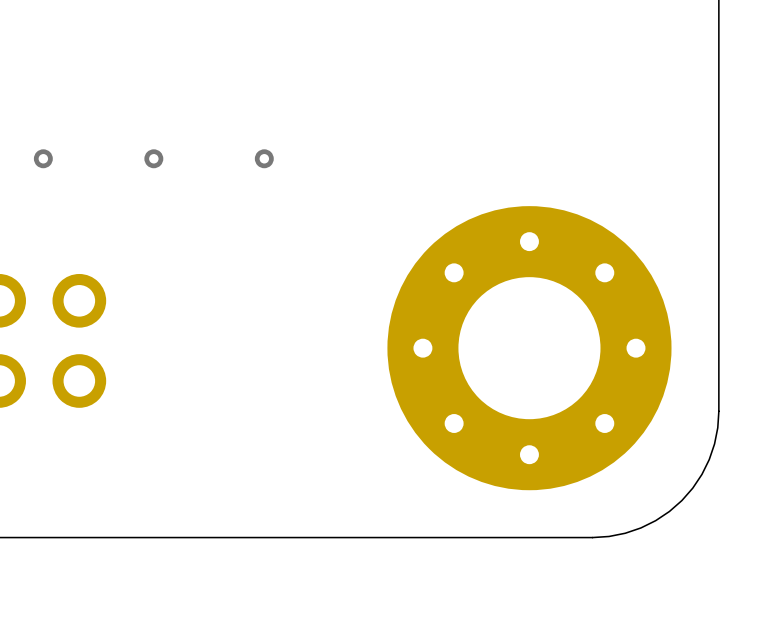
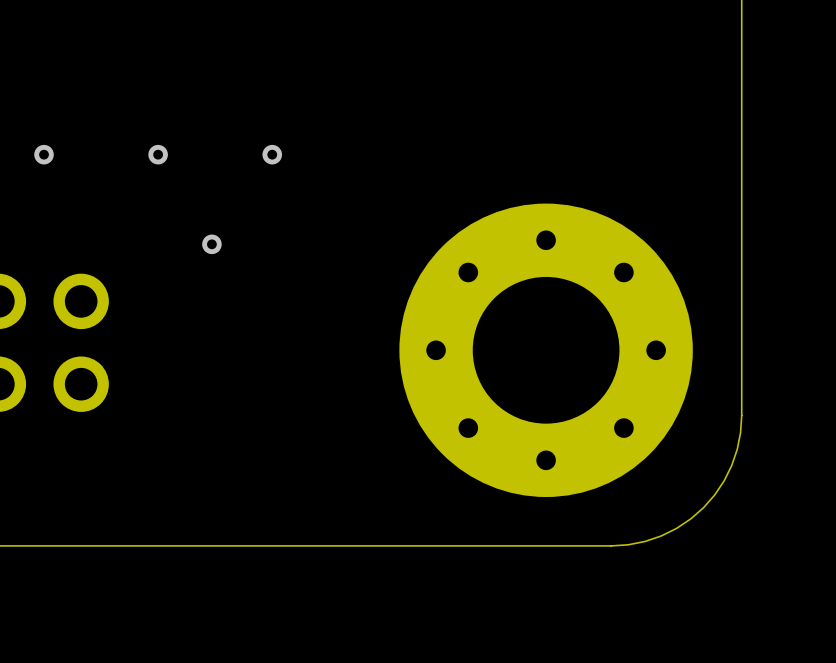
via: none -> (211, 244)

